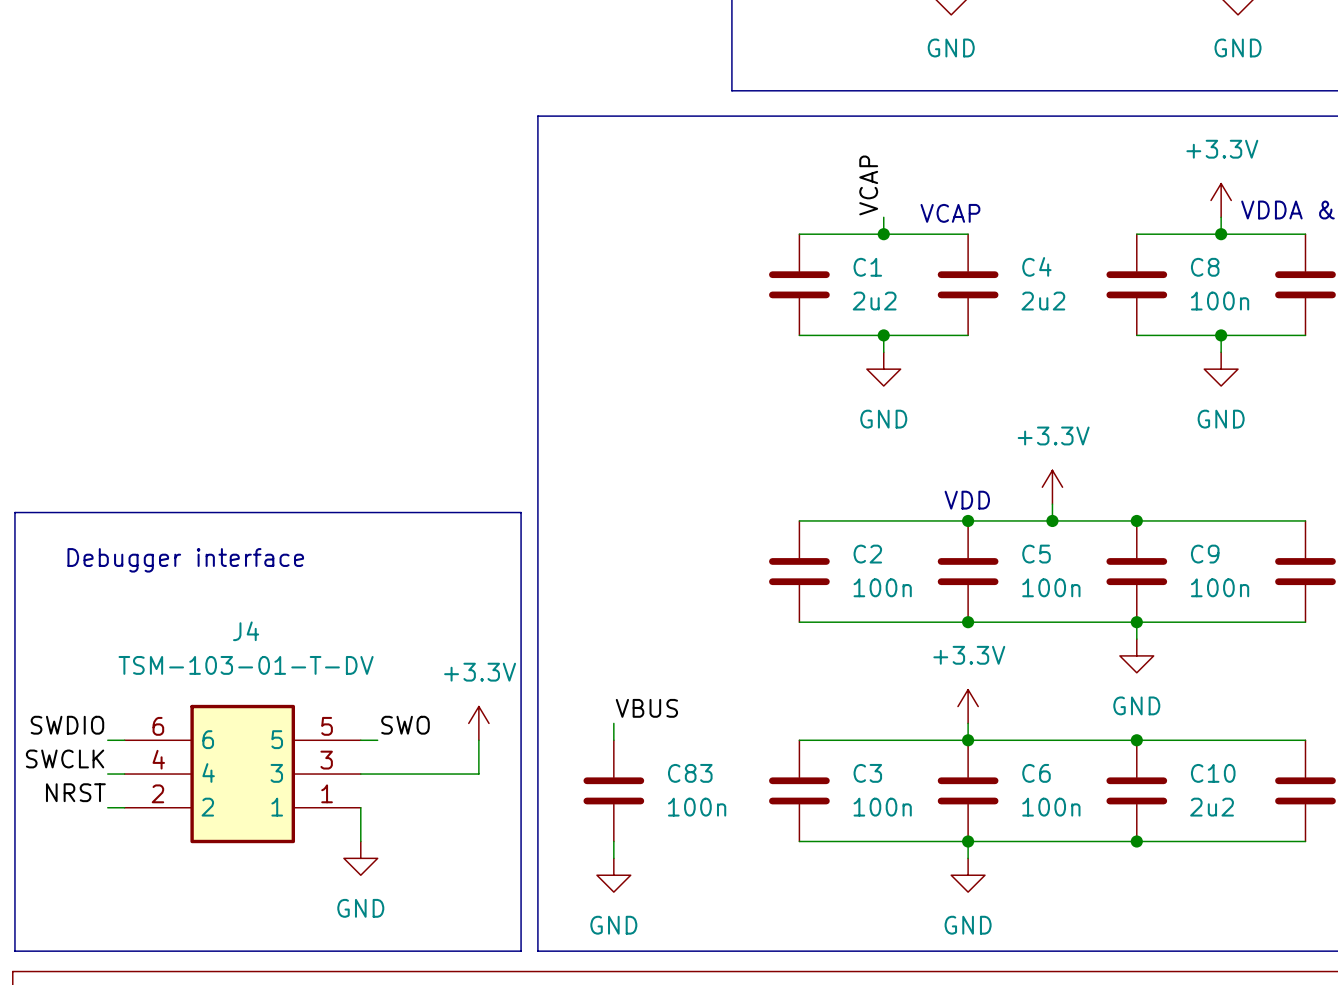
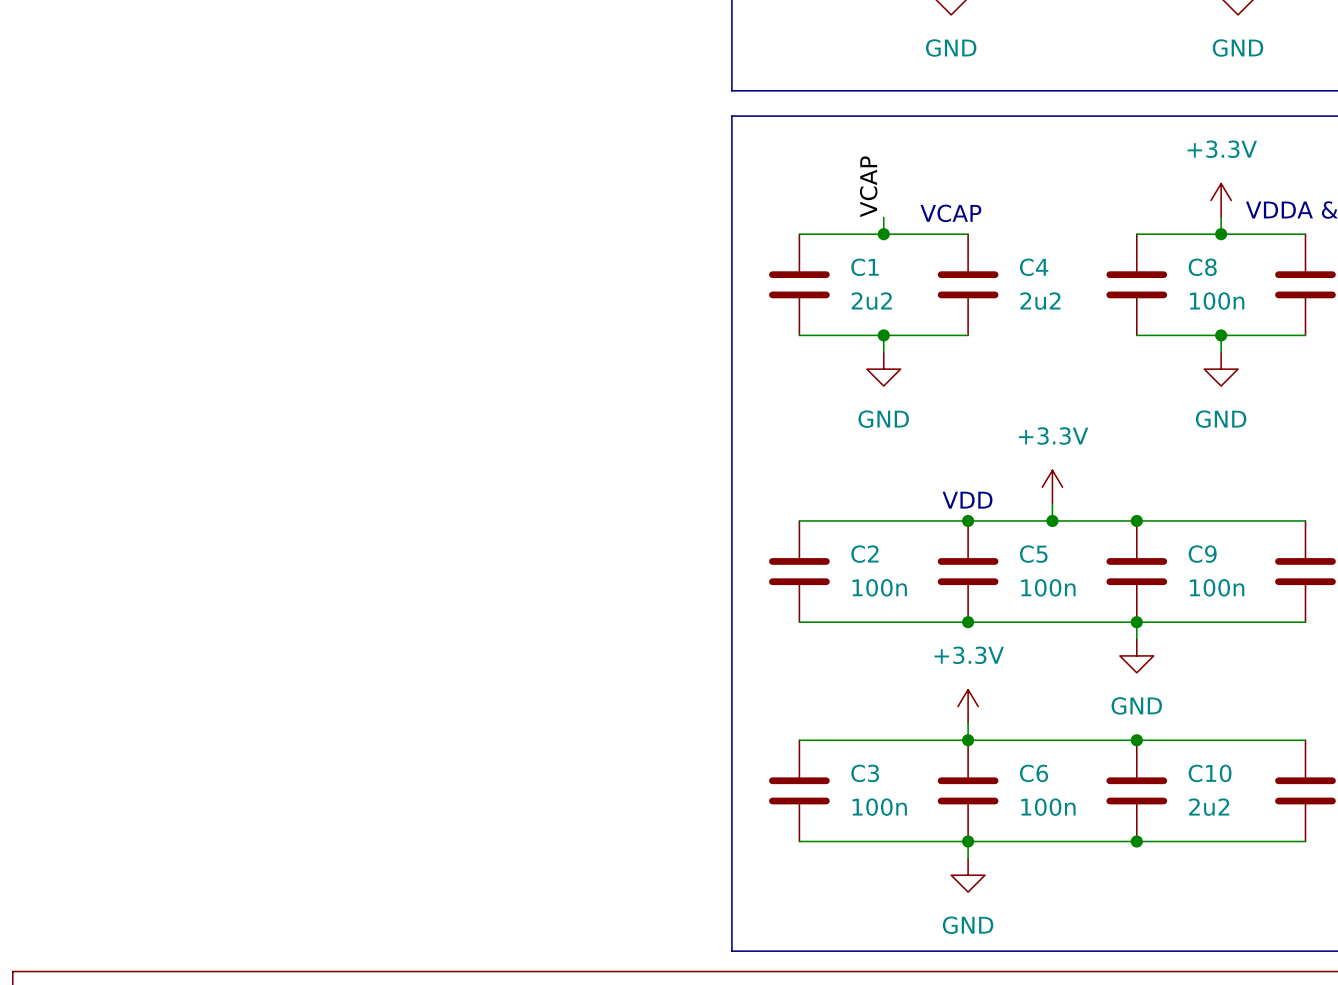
line: (731, 116) (537, 116) (537, 951) (731, 951) -> (731, 116) (731, 951)
line: (14, 512) (521, 512) (521, 951) (14, 951) (14, 512) -> none
text: Debugger interface (185, 560) -> none
label: VBUS (646, 708) -> none
power symbol: +3.3V (478, 723) -> none
wire: (613, 723) (613, 740) -> none
label: SWDIO (67, 725) -> none
label: SWO (405, 725) -> none
wire: (107, 740) (124, 740) -> none
wire: (360, 740) (377, 740) -> none
wire: (478, 740) (478, 774) (360, 774) -> none
label: SWCLK (65, 758) -> none
wire: (107, 774) (124, 774) -> none
J4: TSM-103-01-T-DV (242, 774) -> none
C83: 100n (613, 790) -> none
label: NRST (75, 792) -> none
wire: (107, 807) (124, 807) -> none
wire: (360, 807) (360, 841) -> none
wire: (613, 841) (613, 858) -> none
power symbol: GND (360, 858) -> none
power symbol: GND (613, 875) -> none

